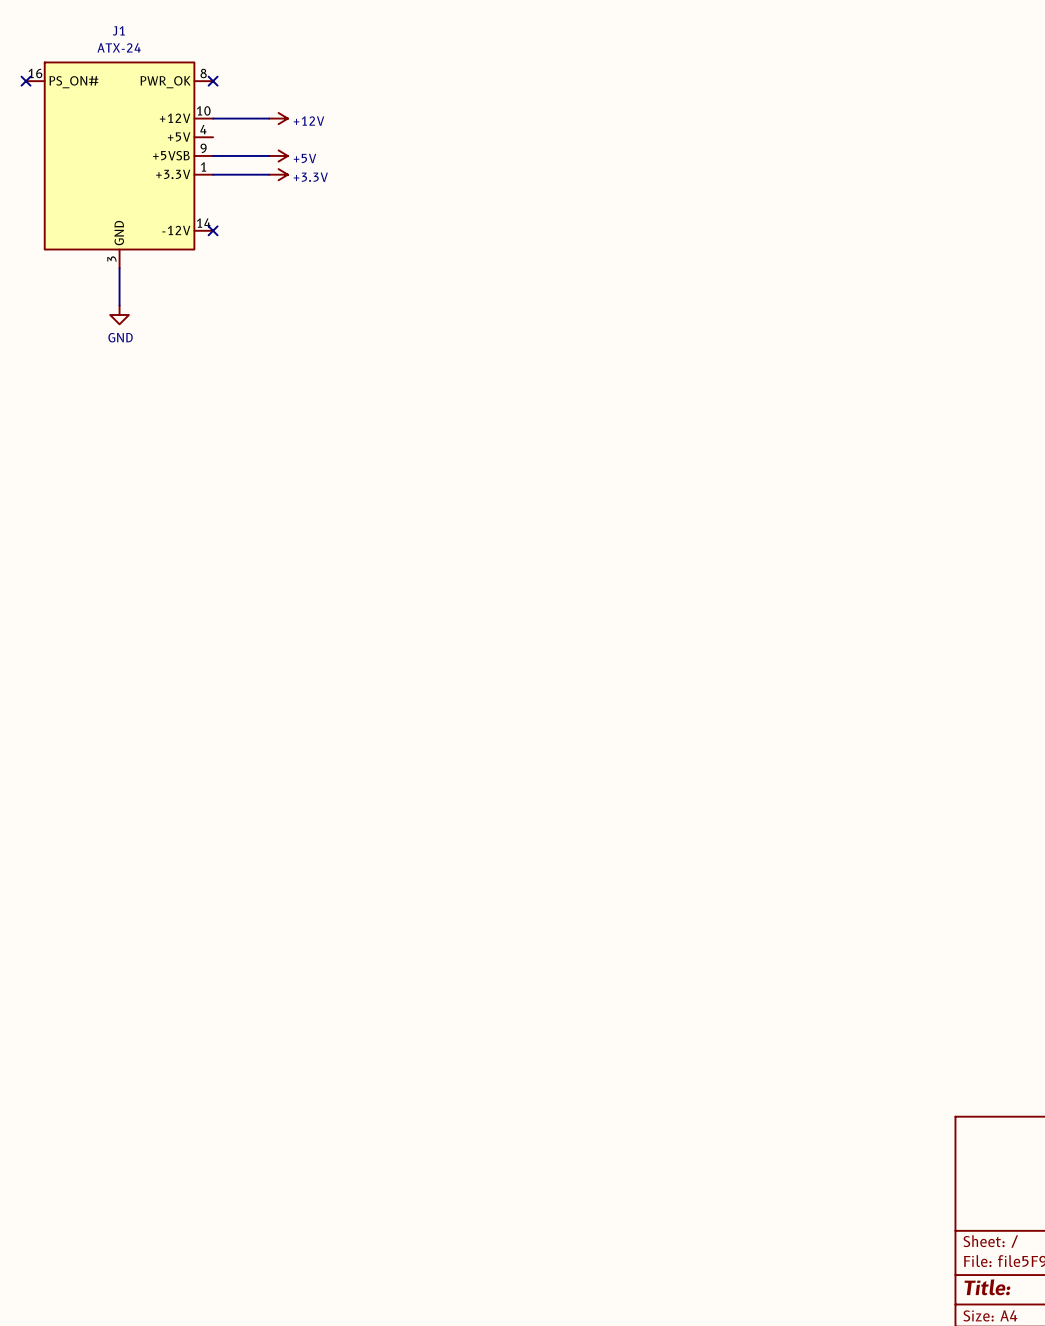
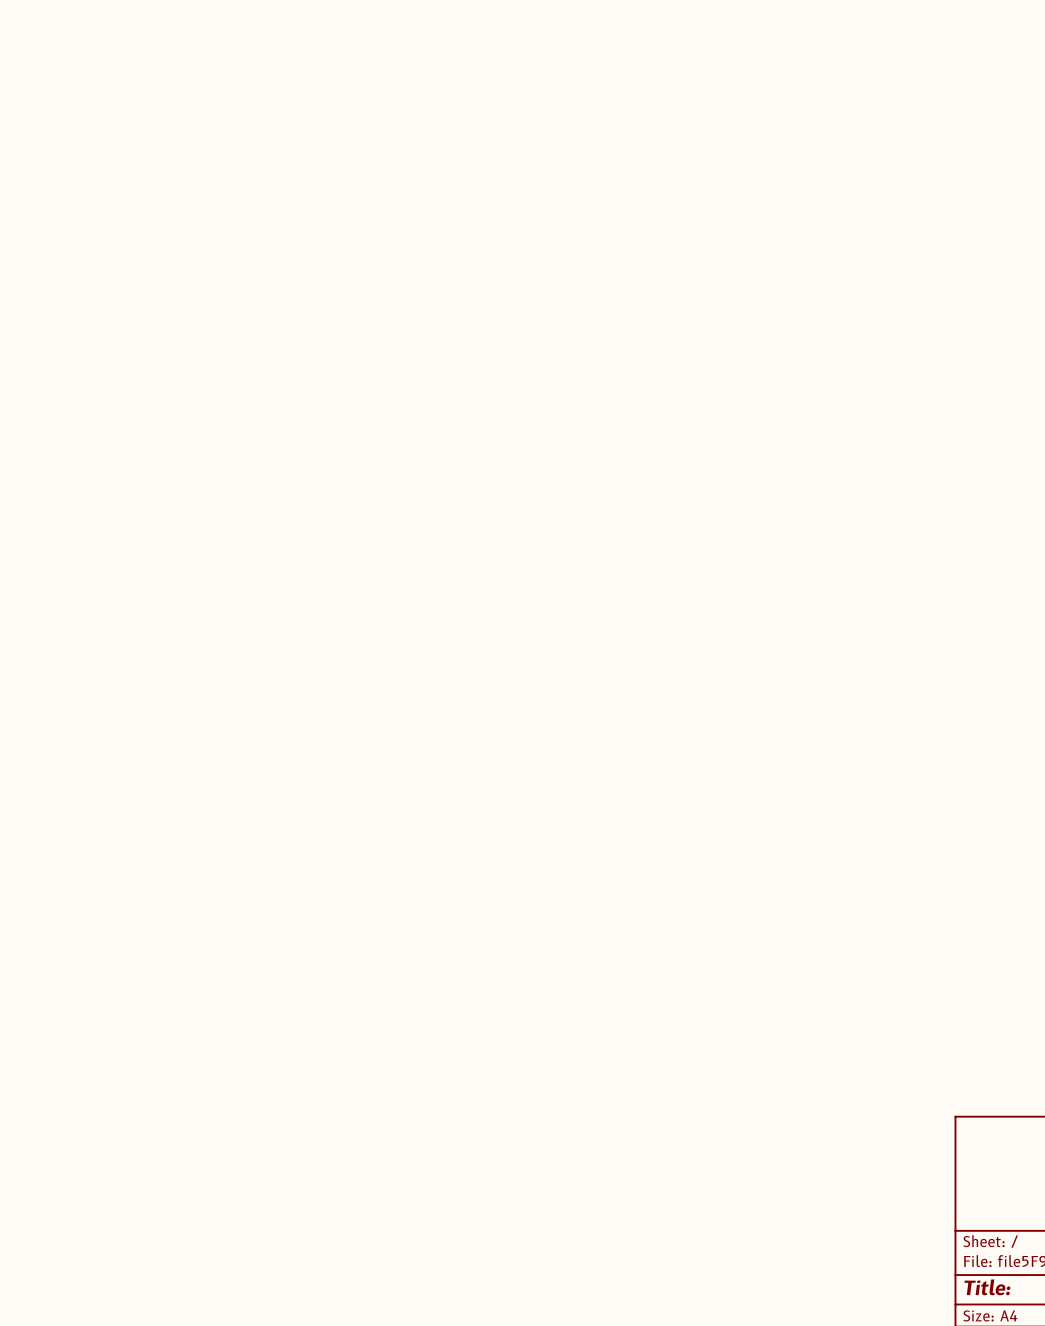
no-connect mark: (26, 81) -> none
no-connect mark: (213, 81) -> none
wire: (213, 118) (269, 118) -> none
power symbol: +12V (278, 118) -> none
wire: (213, 155) (269, 155) -> none
power symbol: +5V (278, 155) -> none
J1: ATX-24 (119, 164) -> none
wire: (213, 174) (269, 174) -> none
power symbol: +3.3V (278, 174) -> none
no-connect mark: (213, 230) -> none
wire: (119, 268) (119, 305) -> none
power symbol: GND (119, 314) -> none

